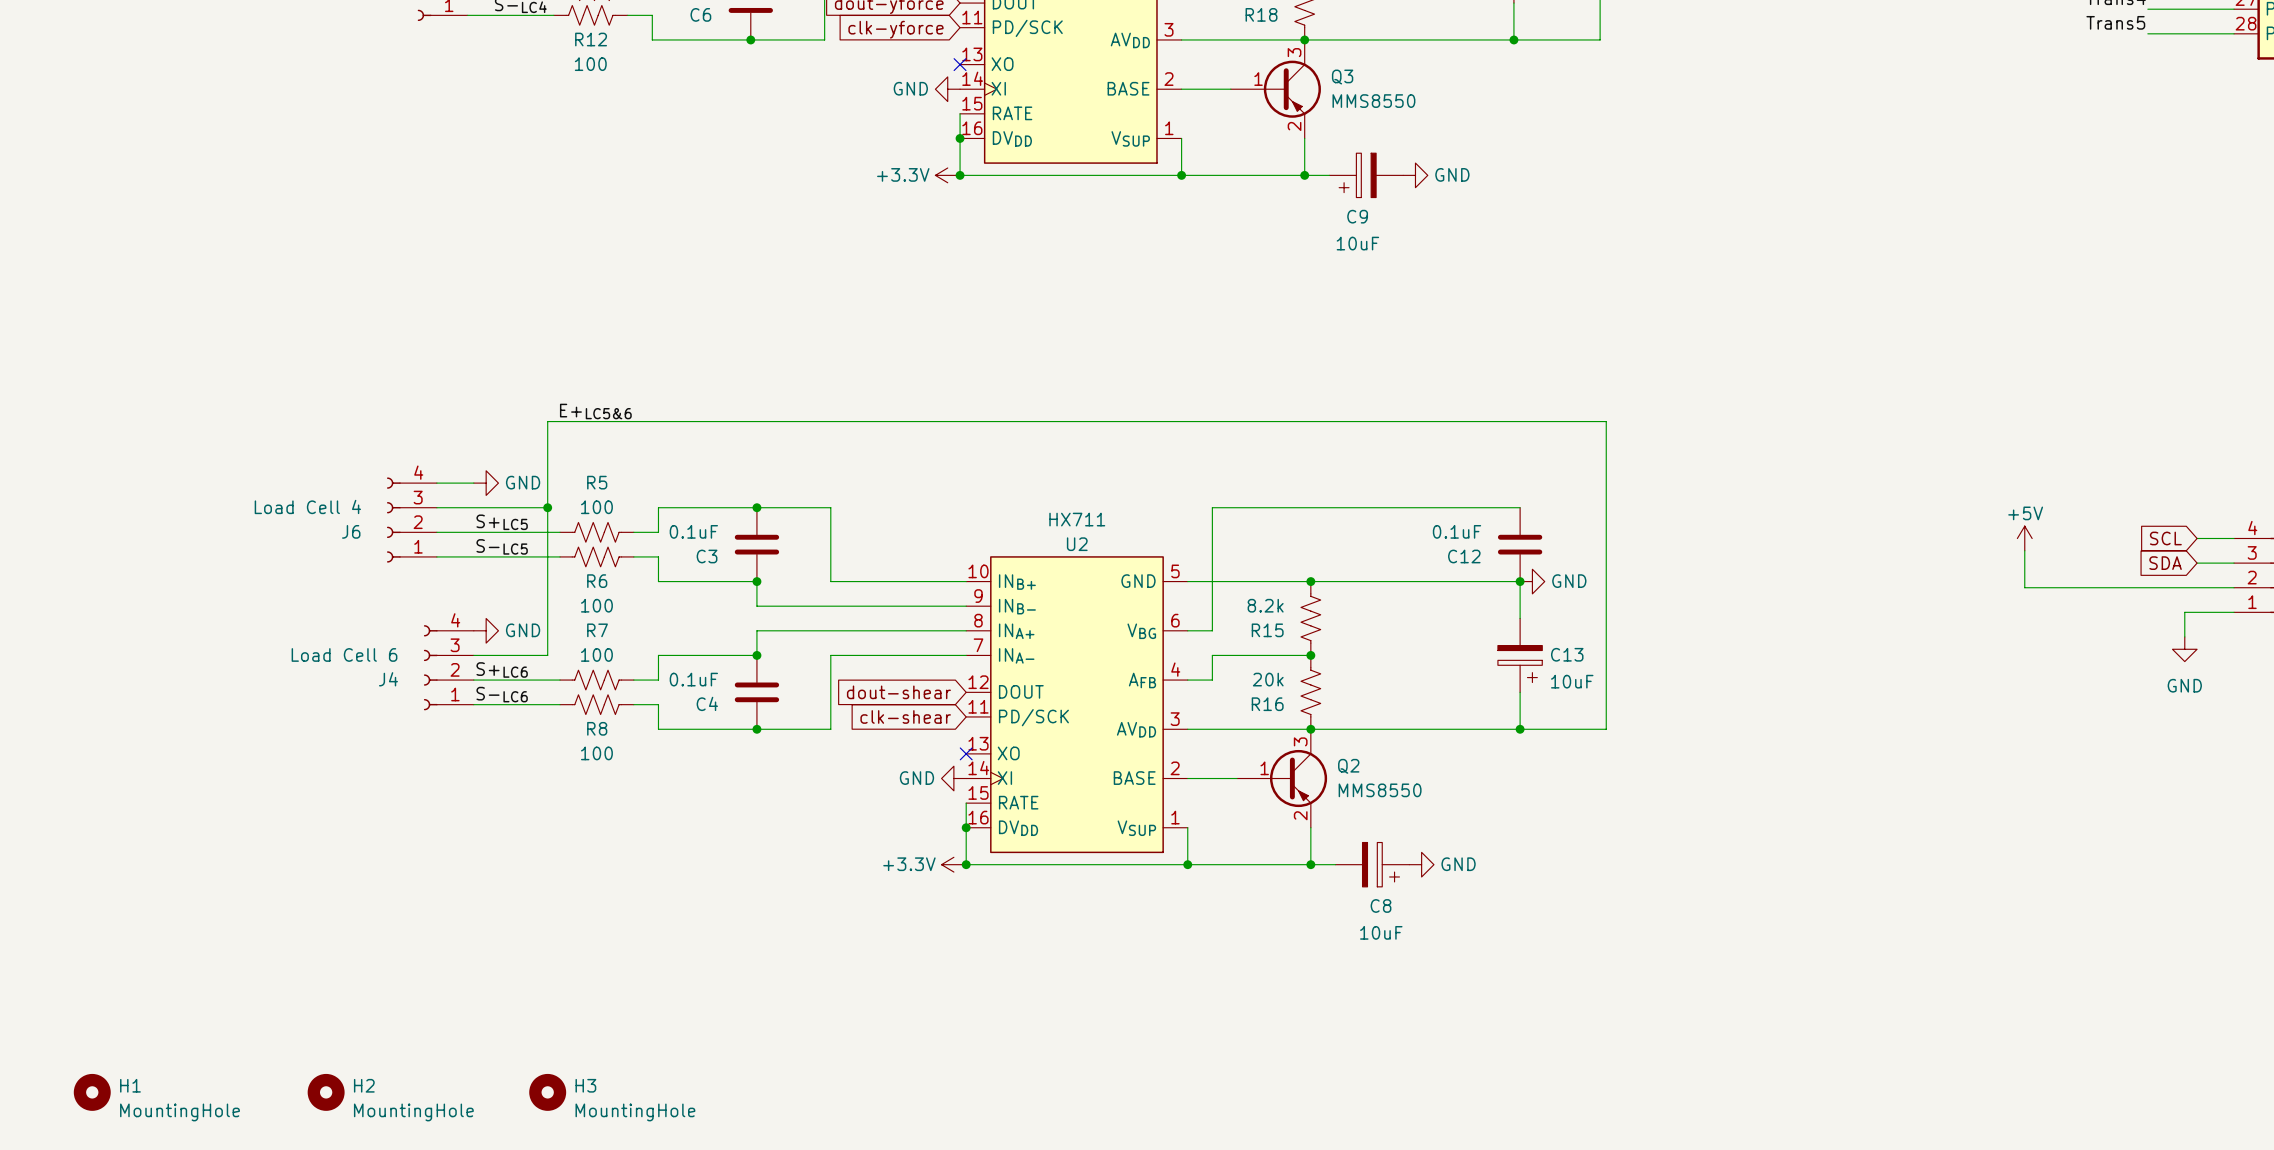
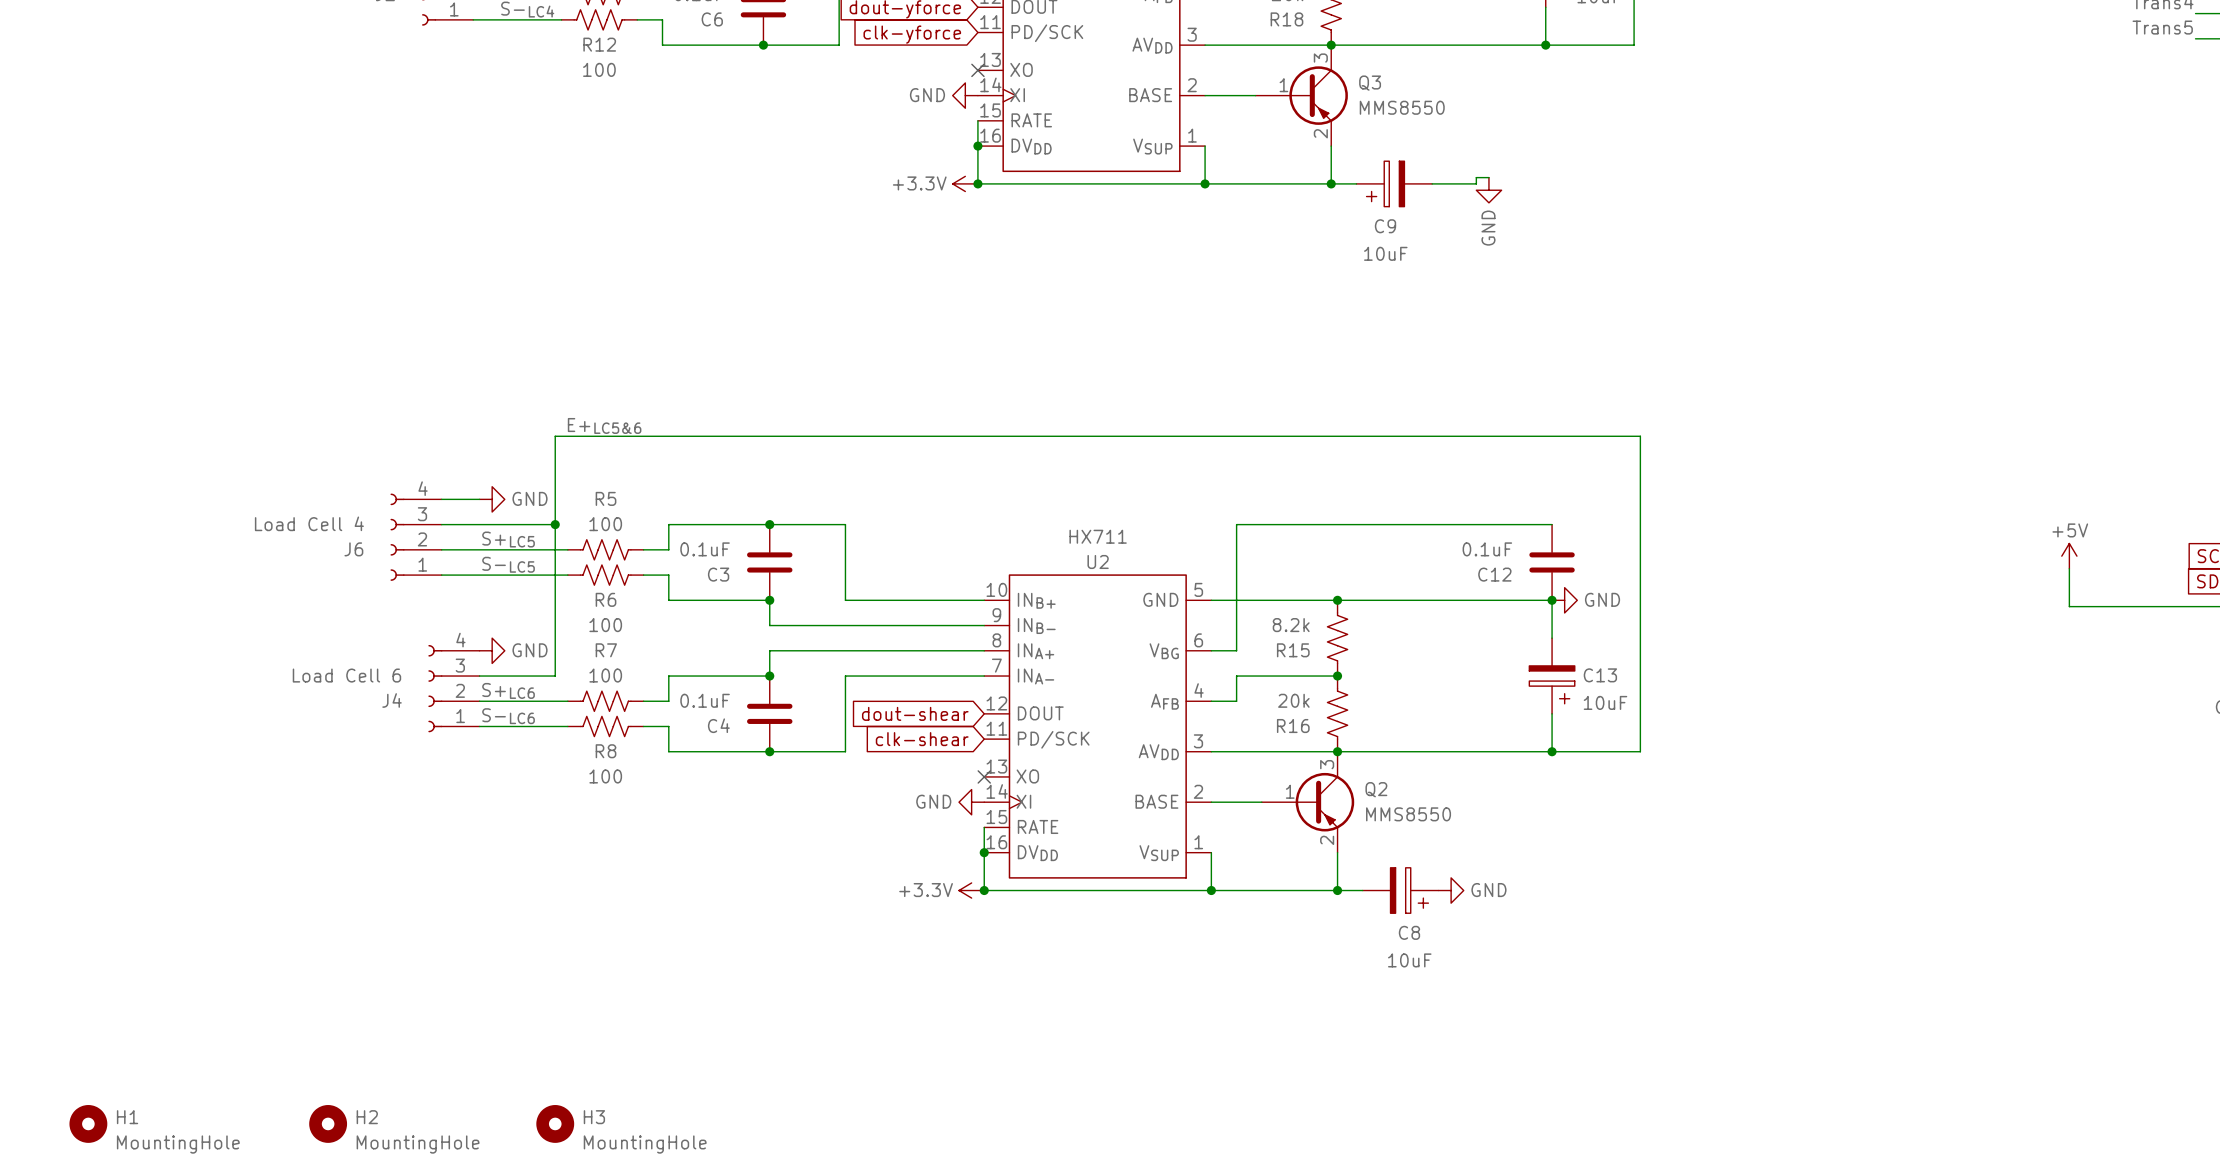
wire: none -> (1488, 177) (1476, 177) (1476, 183) (1432, 183)
power symbol rotation: 0° (1415, 175) -> 90° clockwise (1488, 190)
power symbol position: GND (1415, 175) -> GND (1488, 190)

